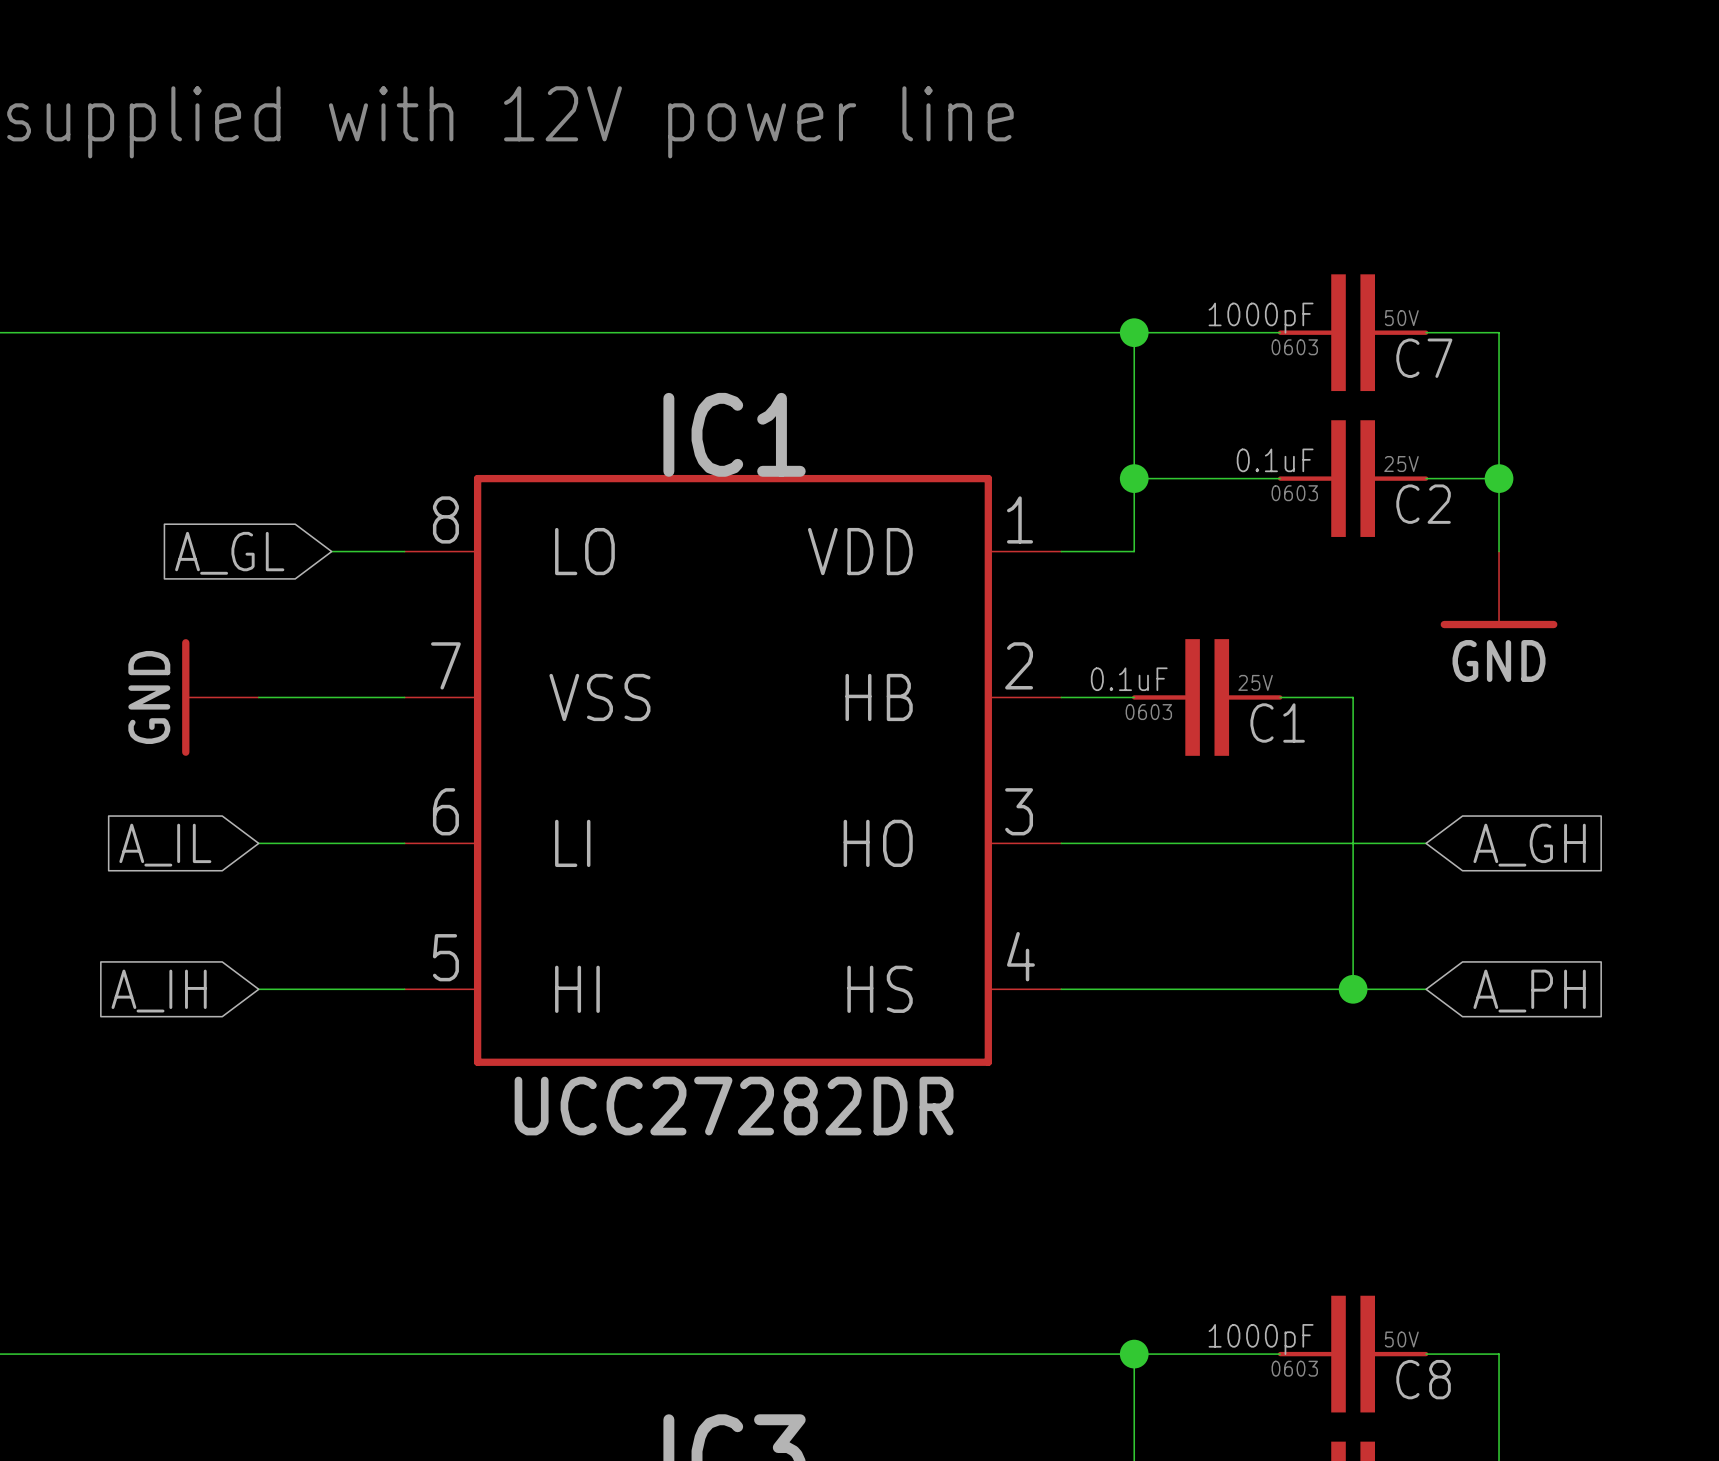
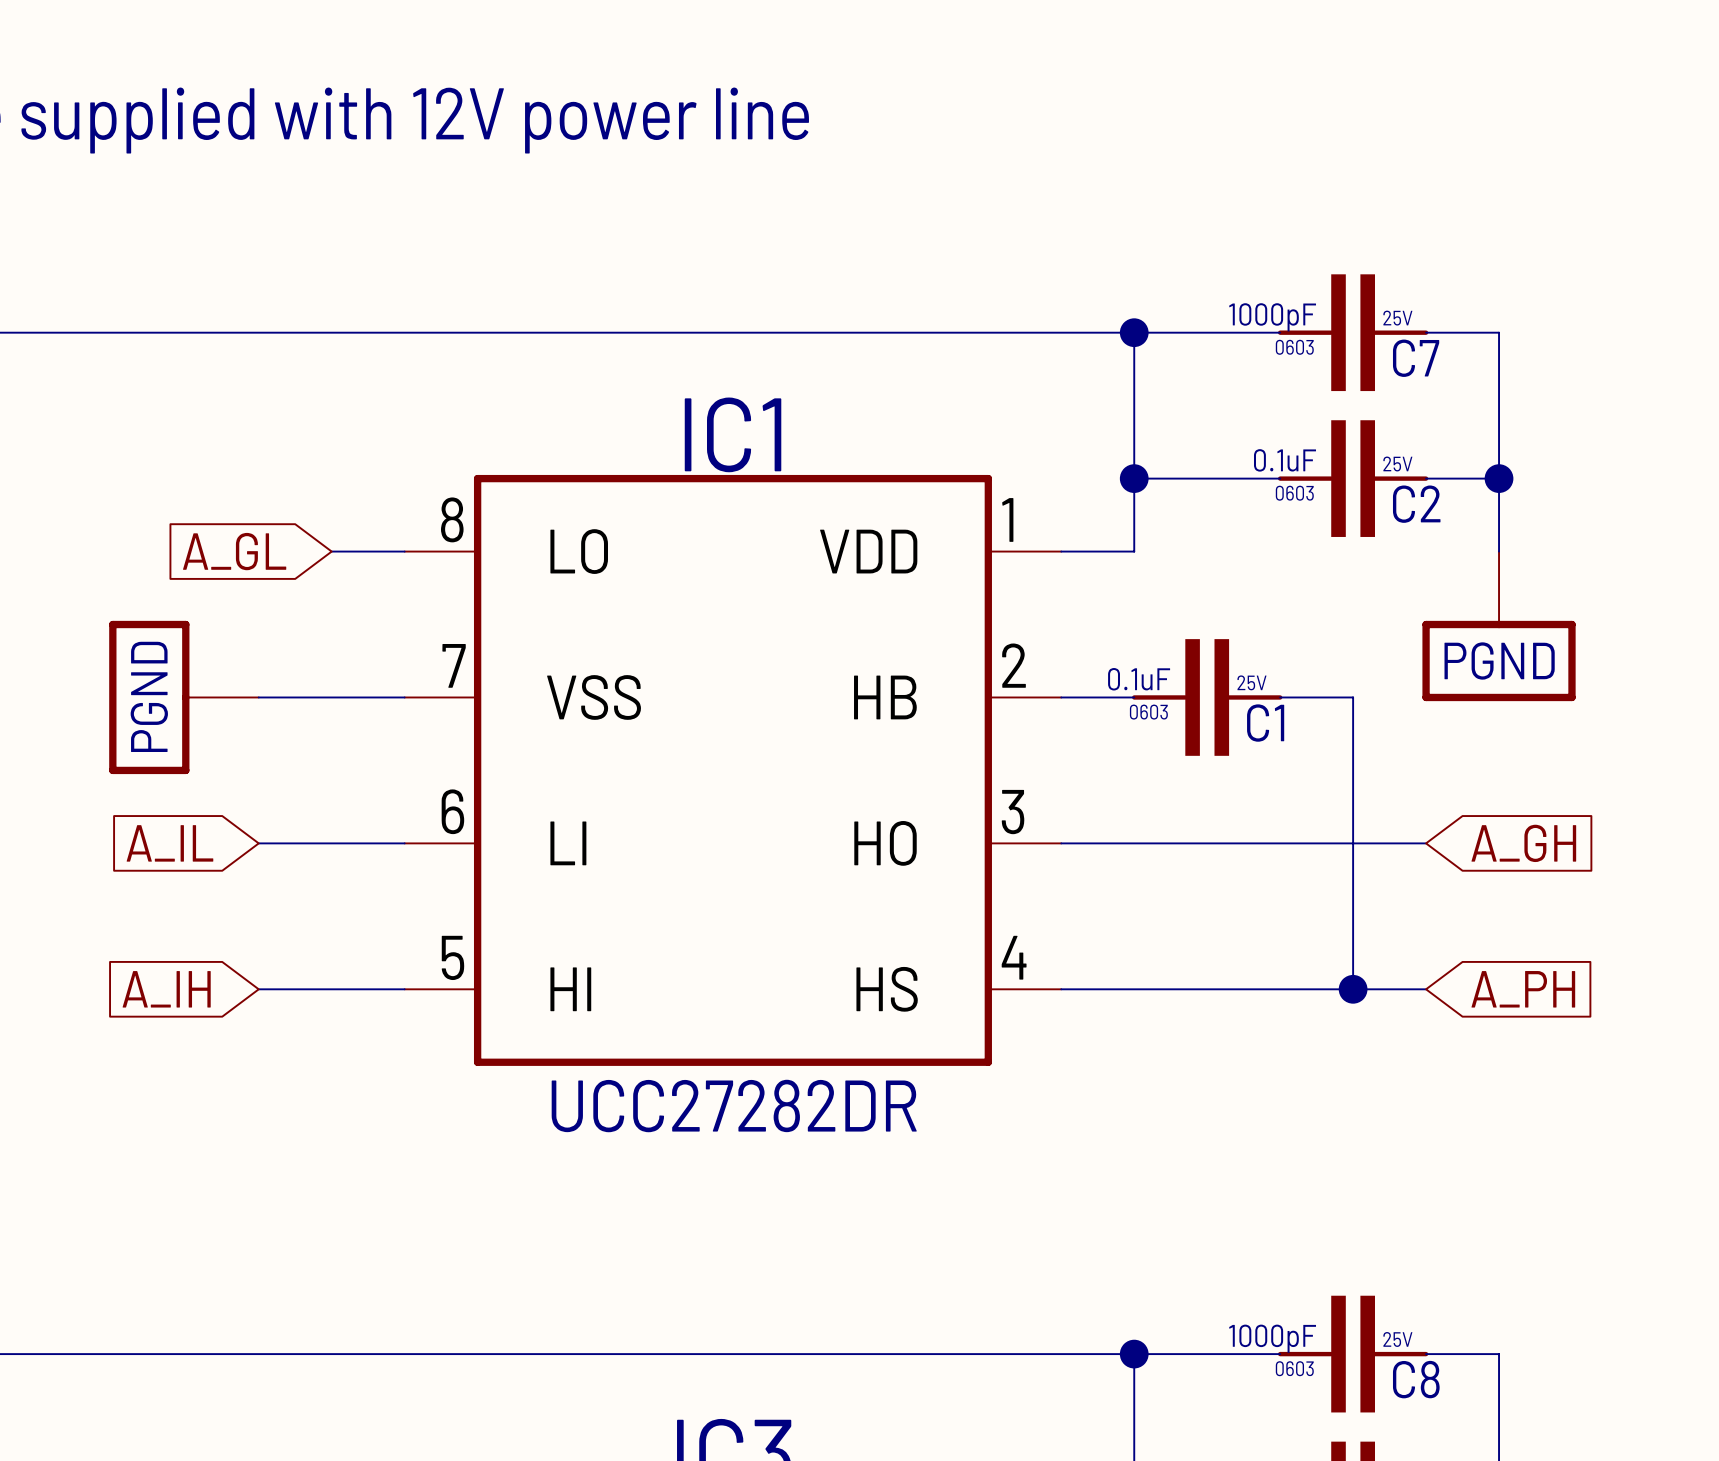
C7 text: 50V (1401, 318) -> 25V (1397, 318)
power symbol: GND (1499, 589) -> none
power symbol: none -> PGND (1499, 626)
power symbol: none -> PGND (183, 697)
power symbol: GND (220, 697) -> none
C8 text: 50V (1401, 1339) -> 25V (1397, 1339)

